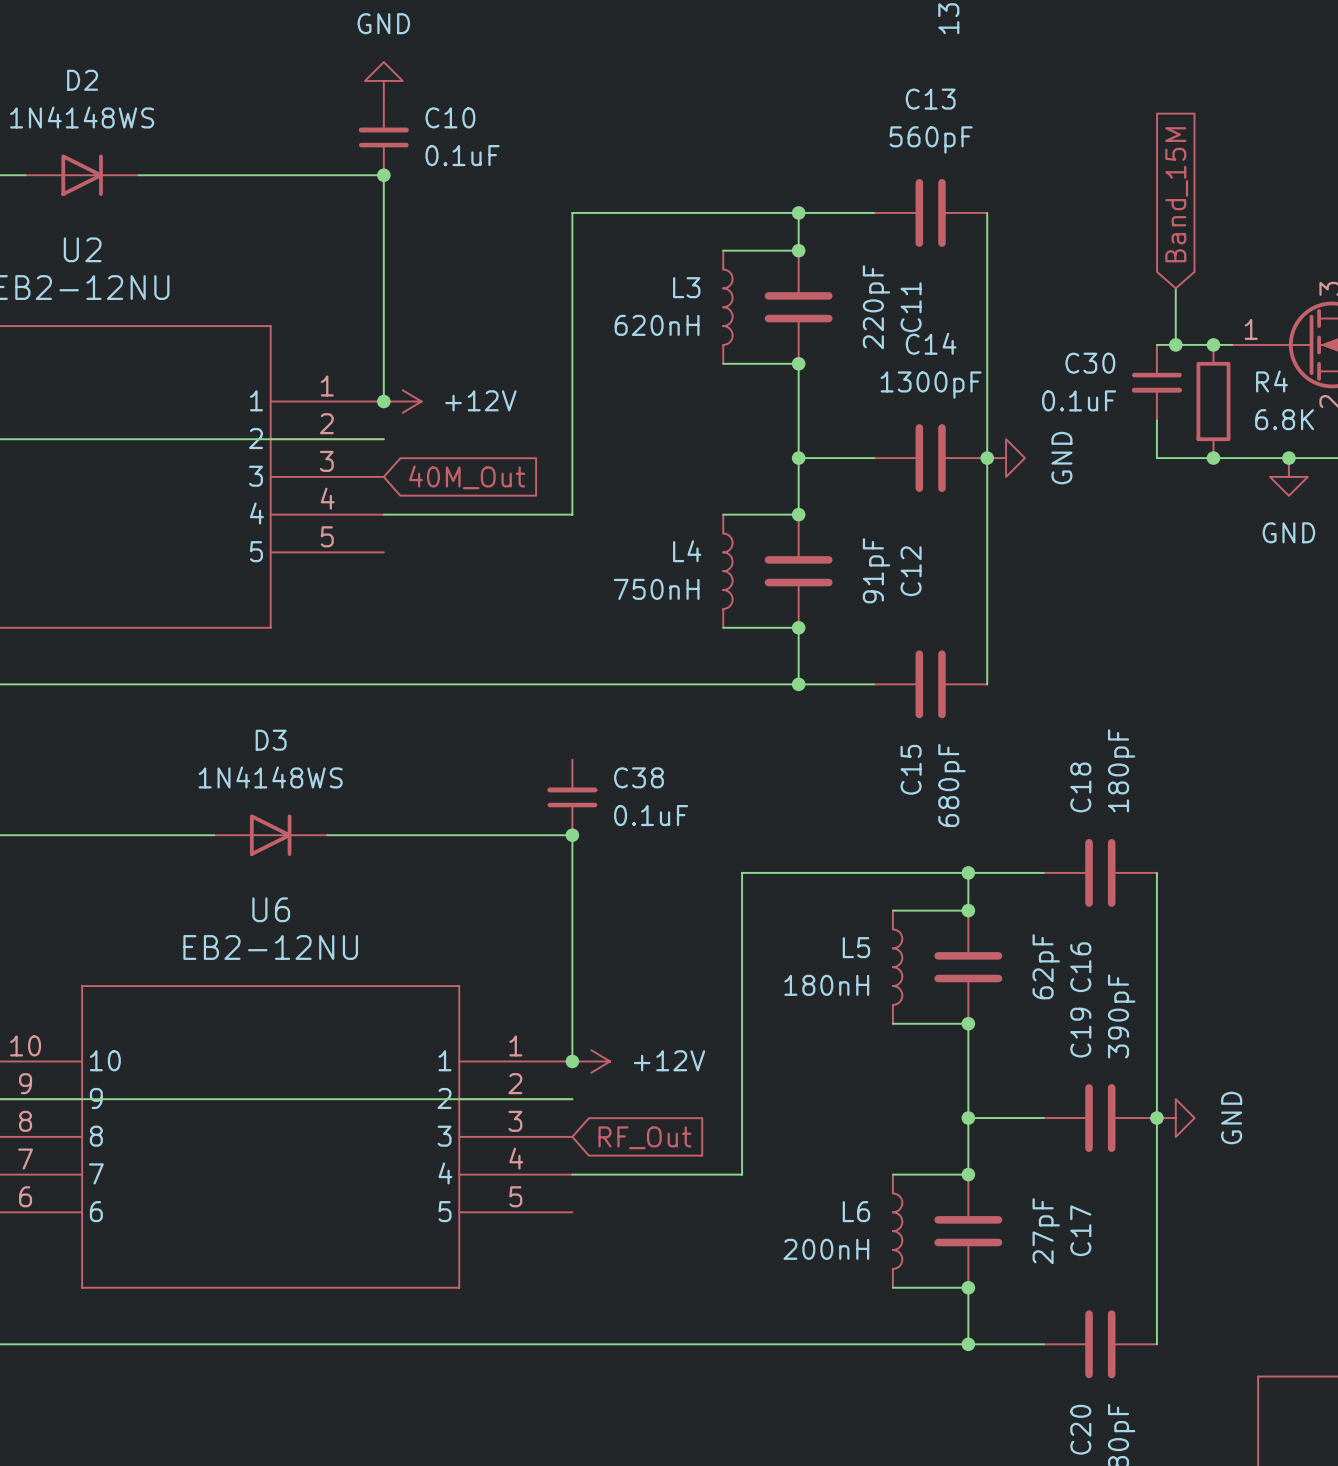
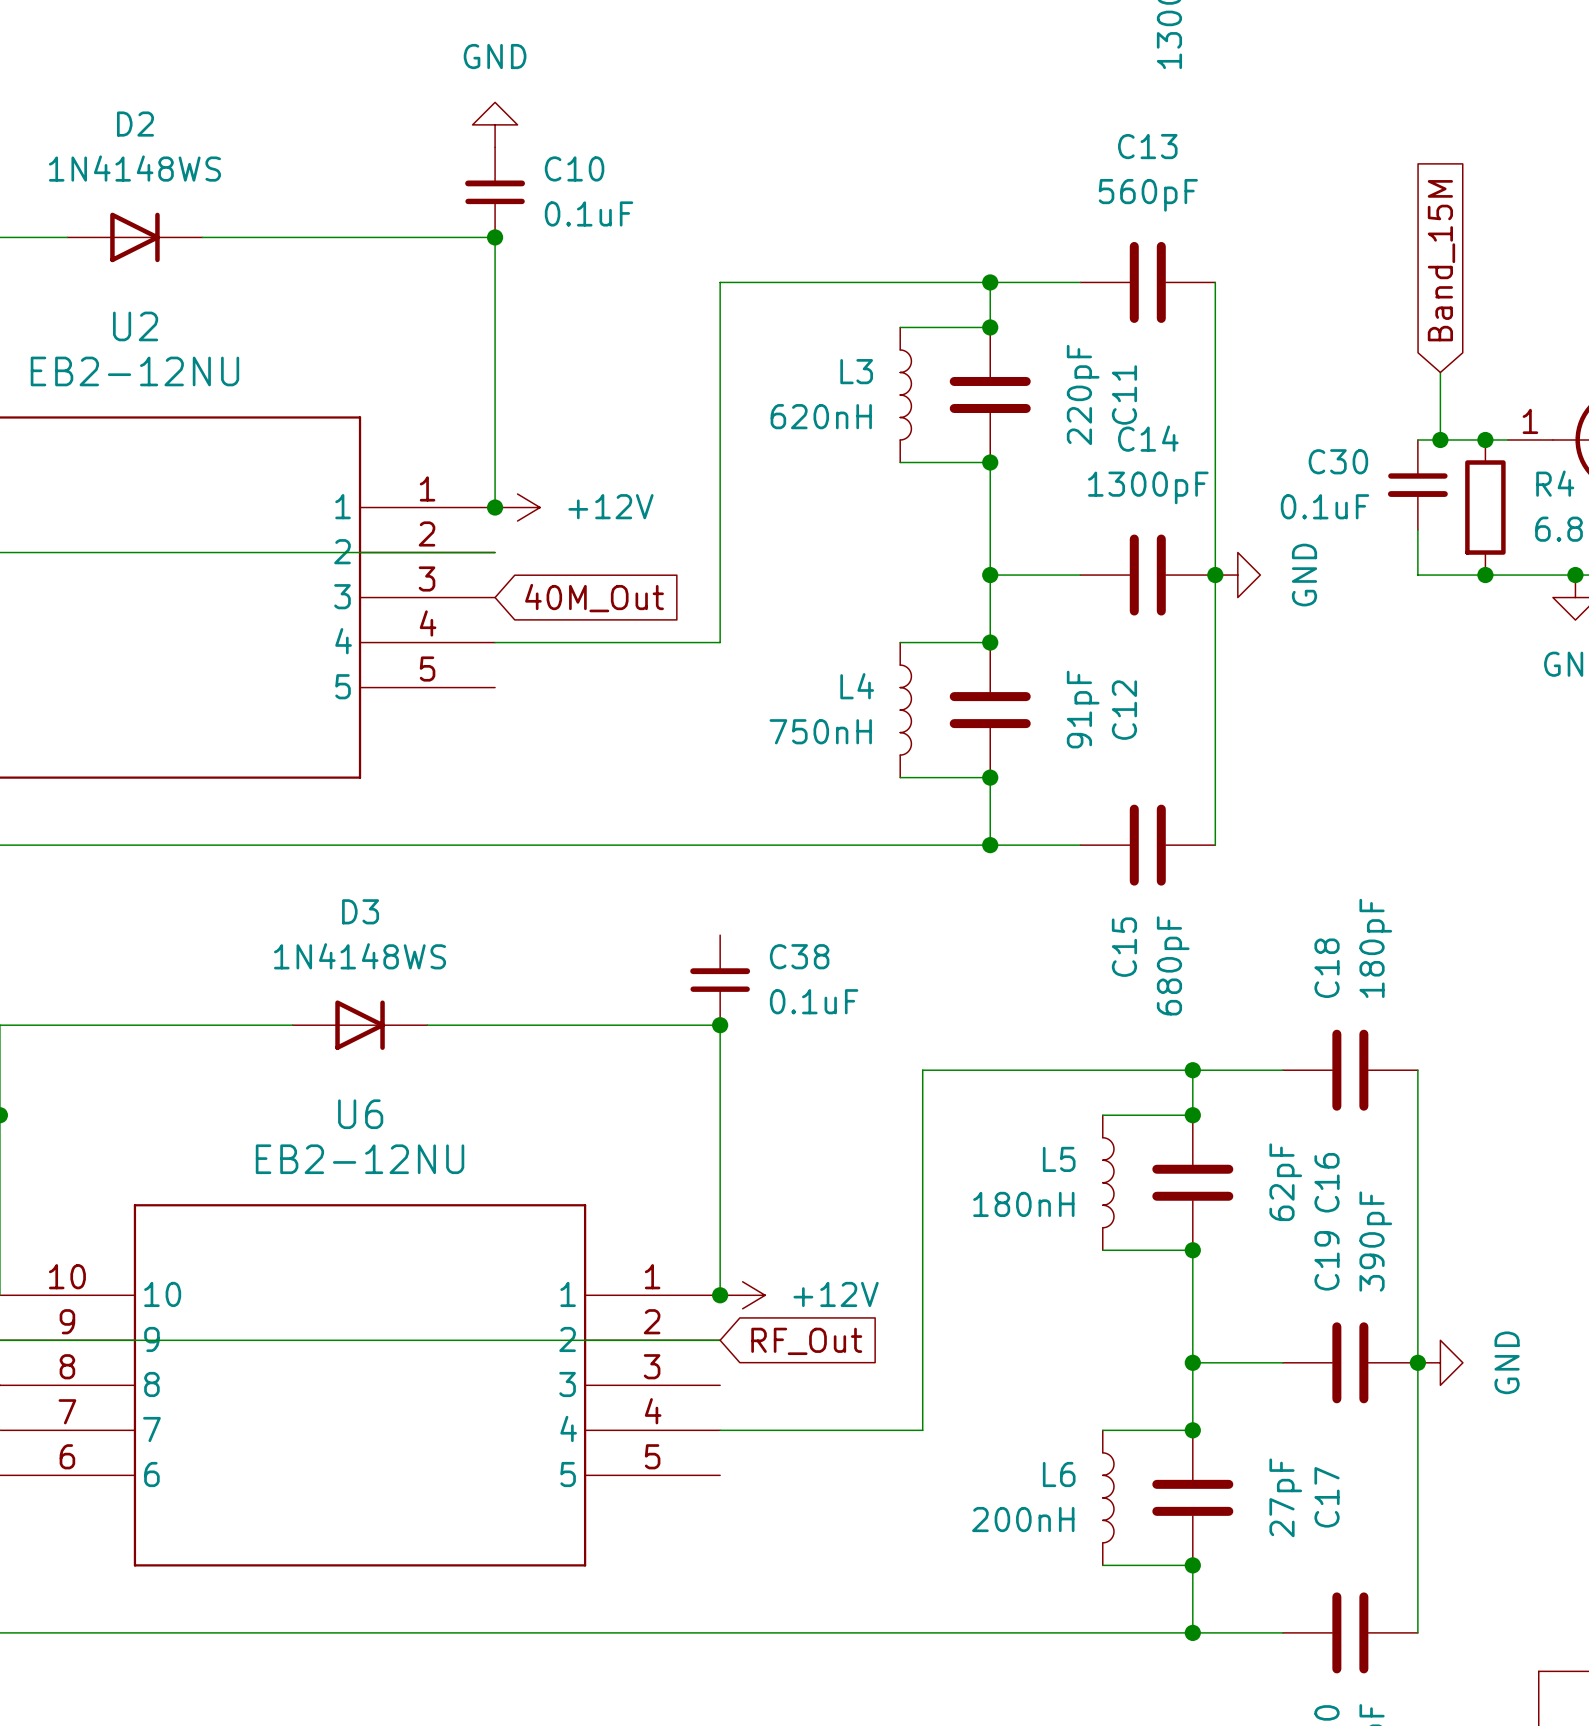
global label position: RF_Out (644, 1137) -> RF_Out (806, 1341)

